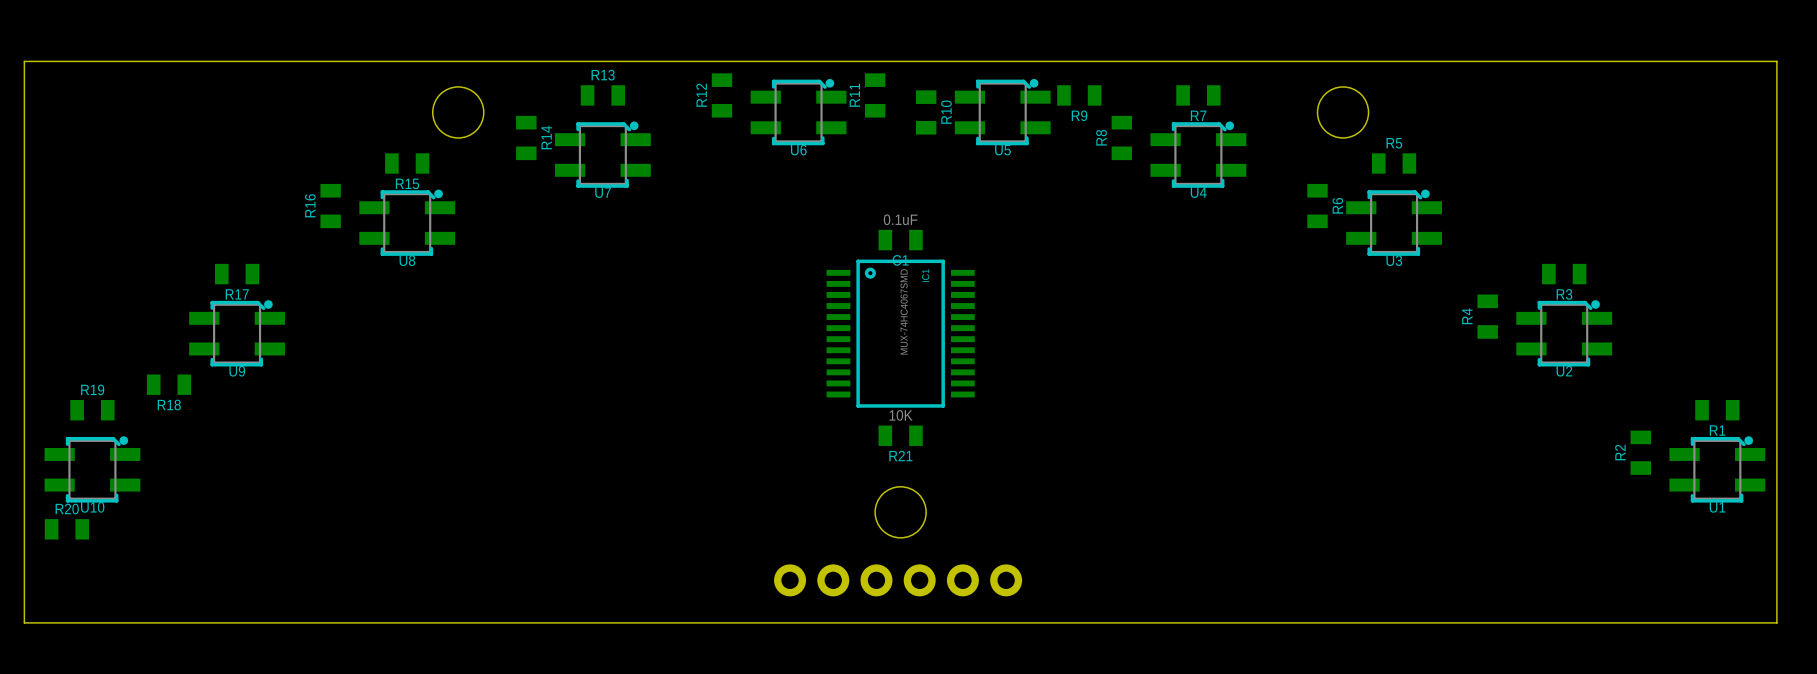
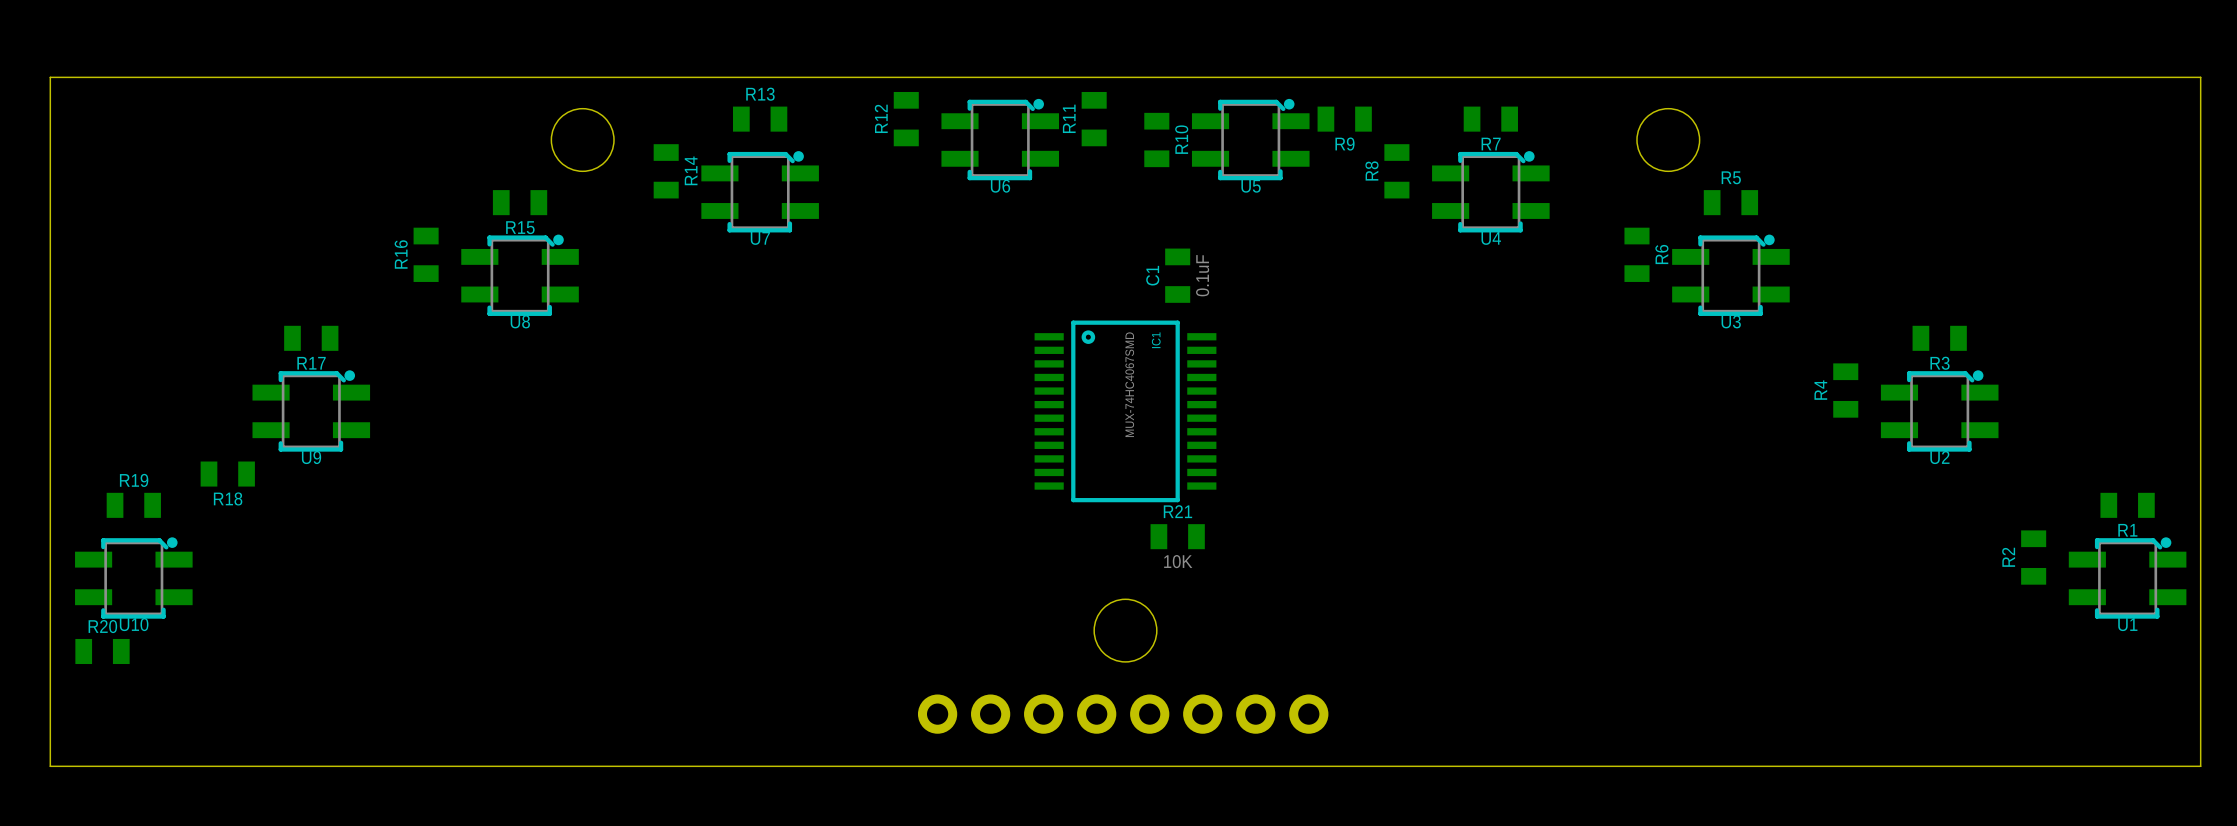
C1 rotation: 0° (900, 240) -> 90° clockwise (1177, 275)
C1 position: (900, 240) -> (1177, 275)
R21 value position: 10K (901, 415) -> 10K (1178, 561)
R21 position: (900, 435) -> (1177, 536)
R21 name position: R21 (900, 455) -> R21 (1177, 511)
part footprint: [774, 564, 1023, 597] -> [917, 694, 1329, 734]

